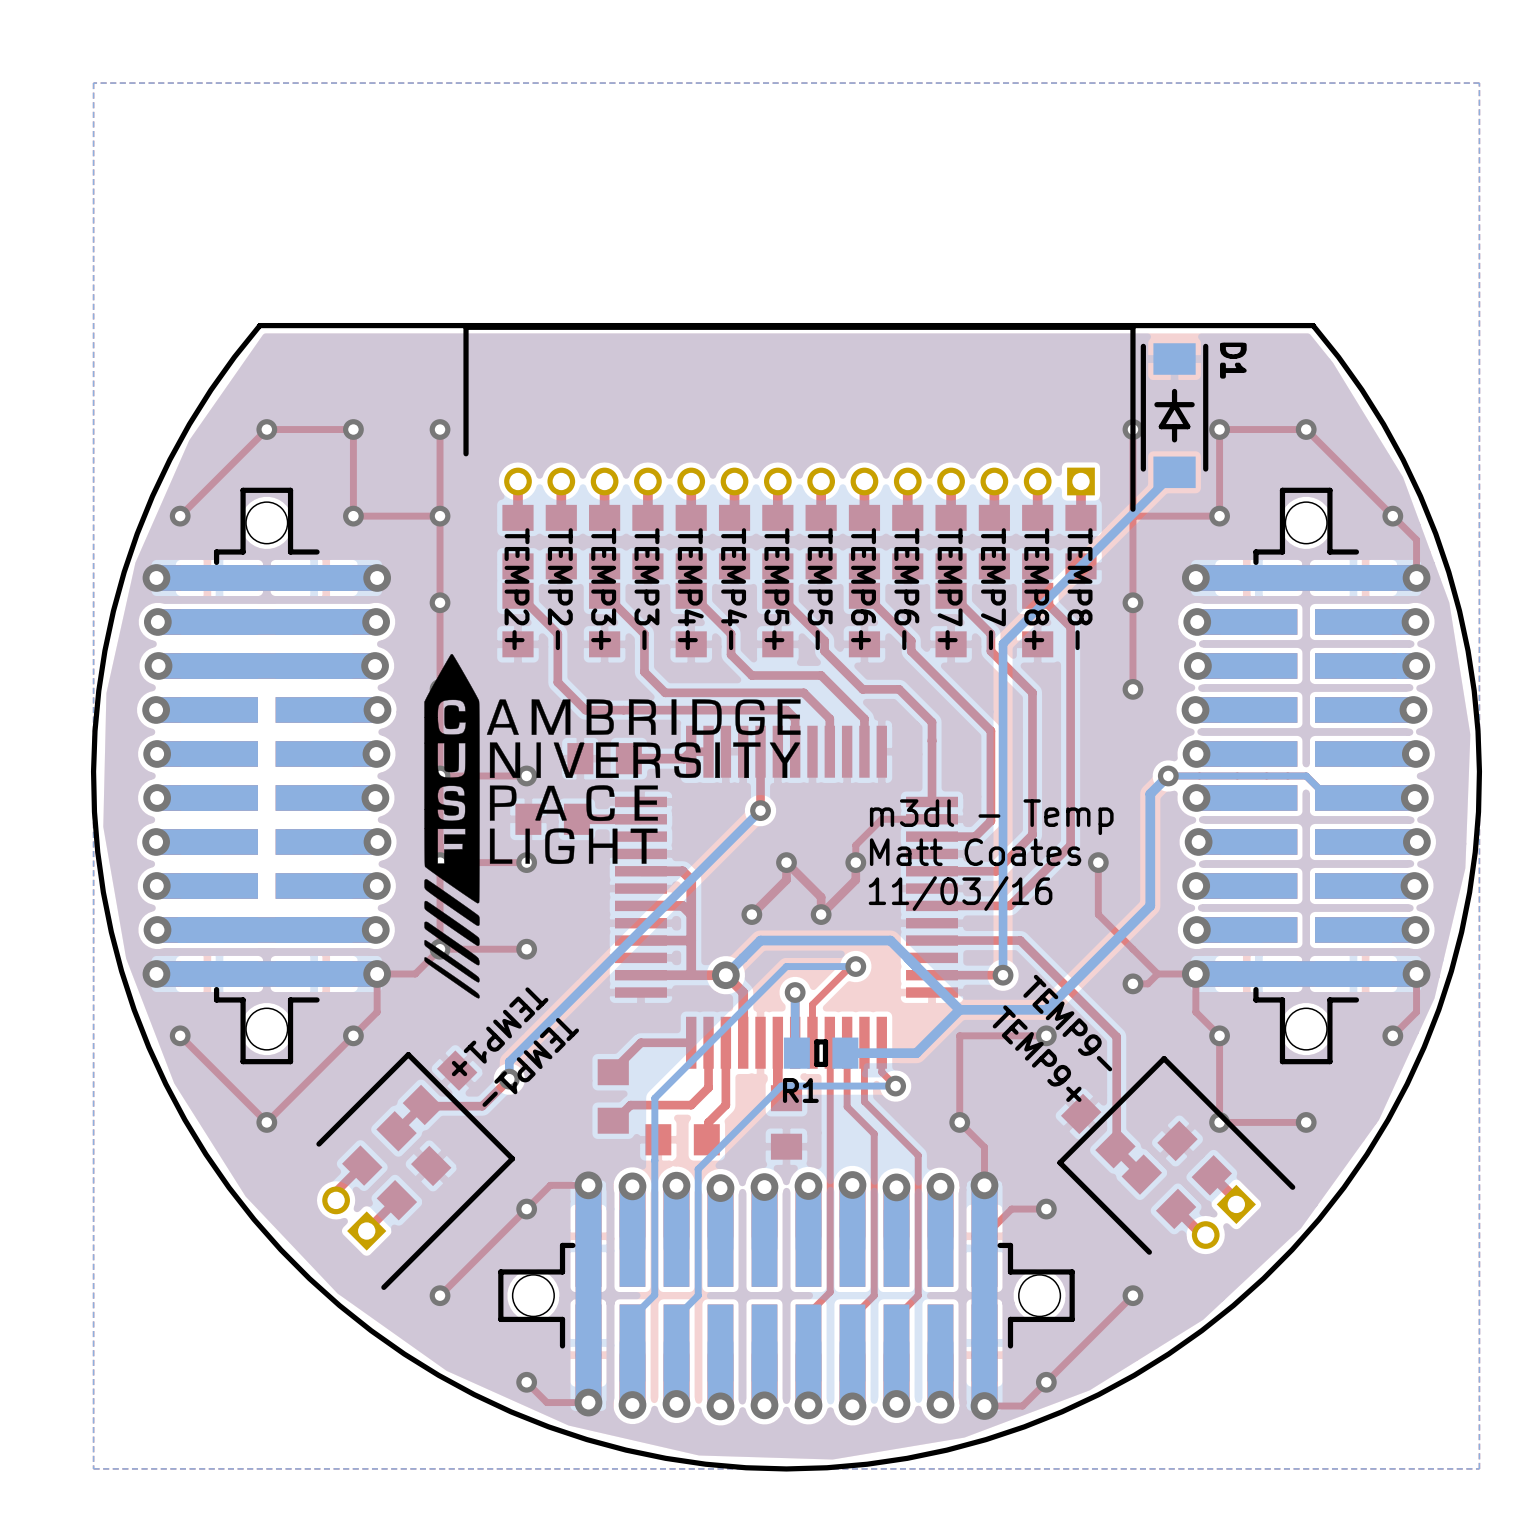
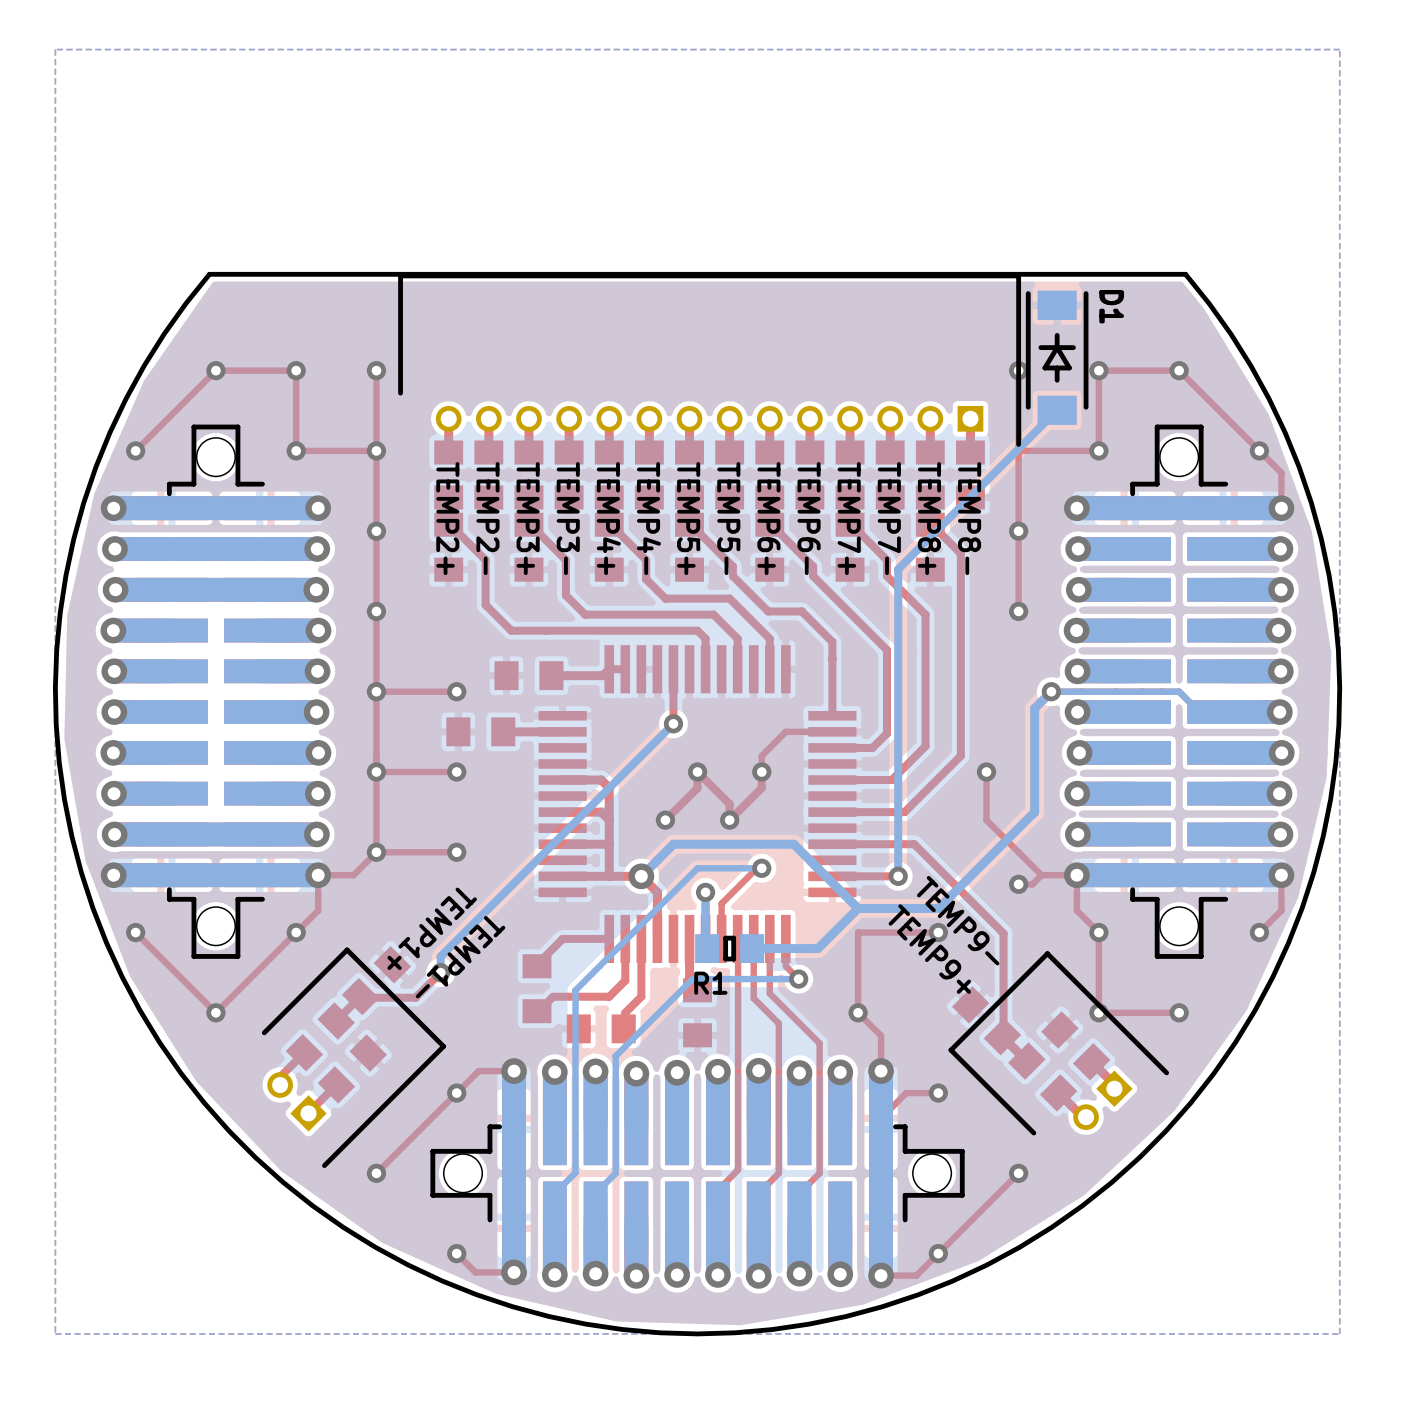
drawing: [424, 654, 801, 999] -> none
text: m3dl - Temp (991, 817) -> none
text: Matt Coates (975, 852) -> none
text: 11/03/16 (960, 893) -> none

